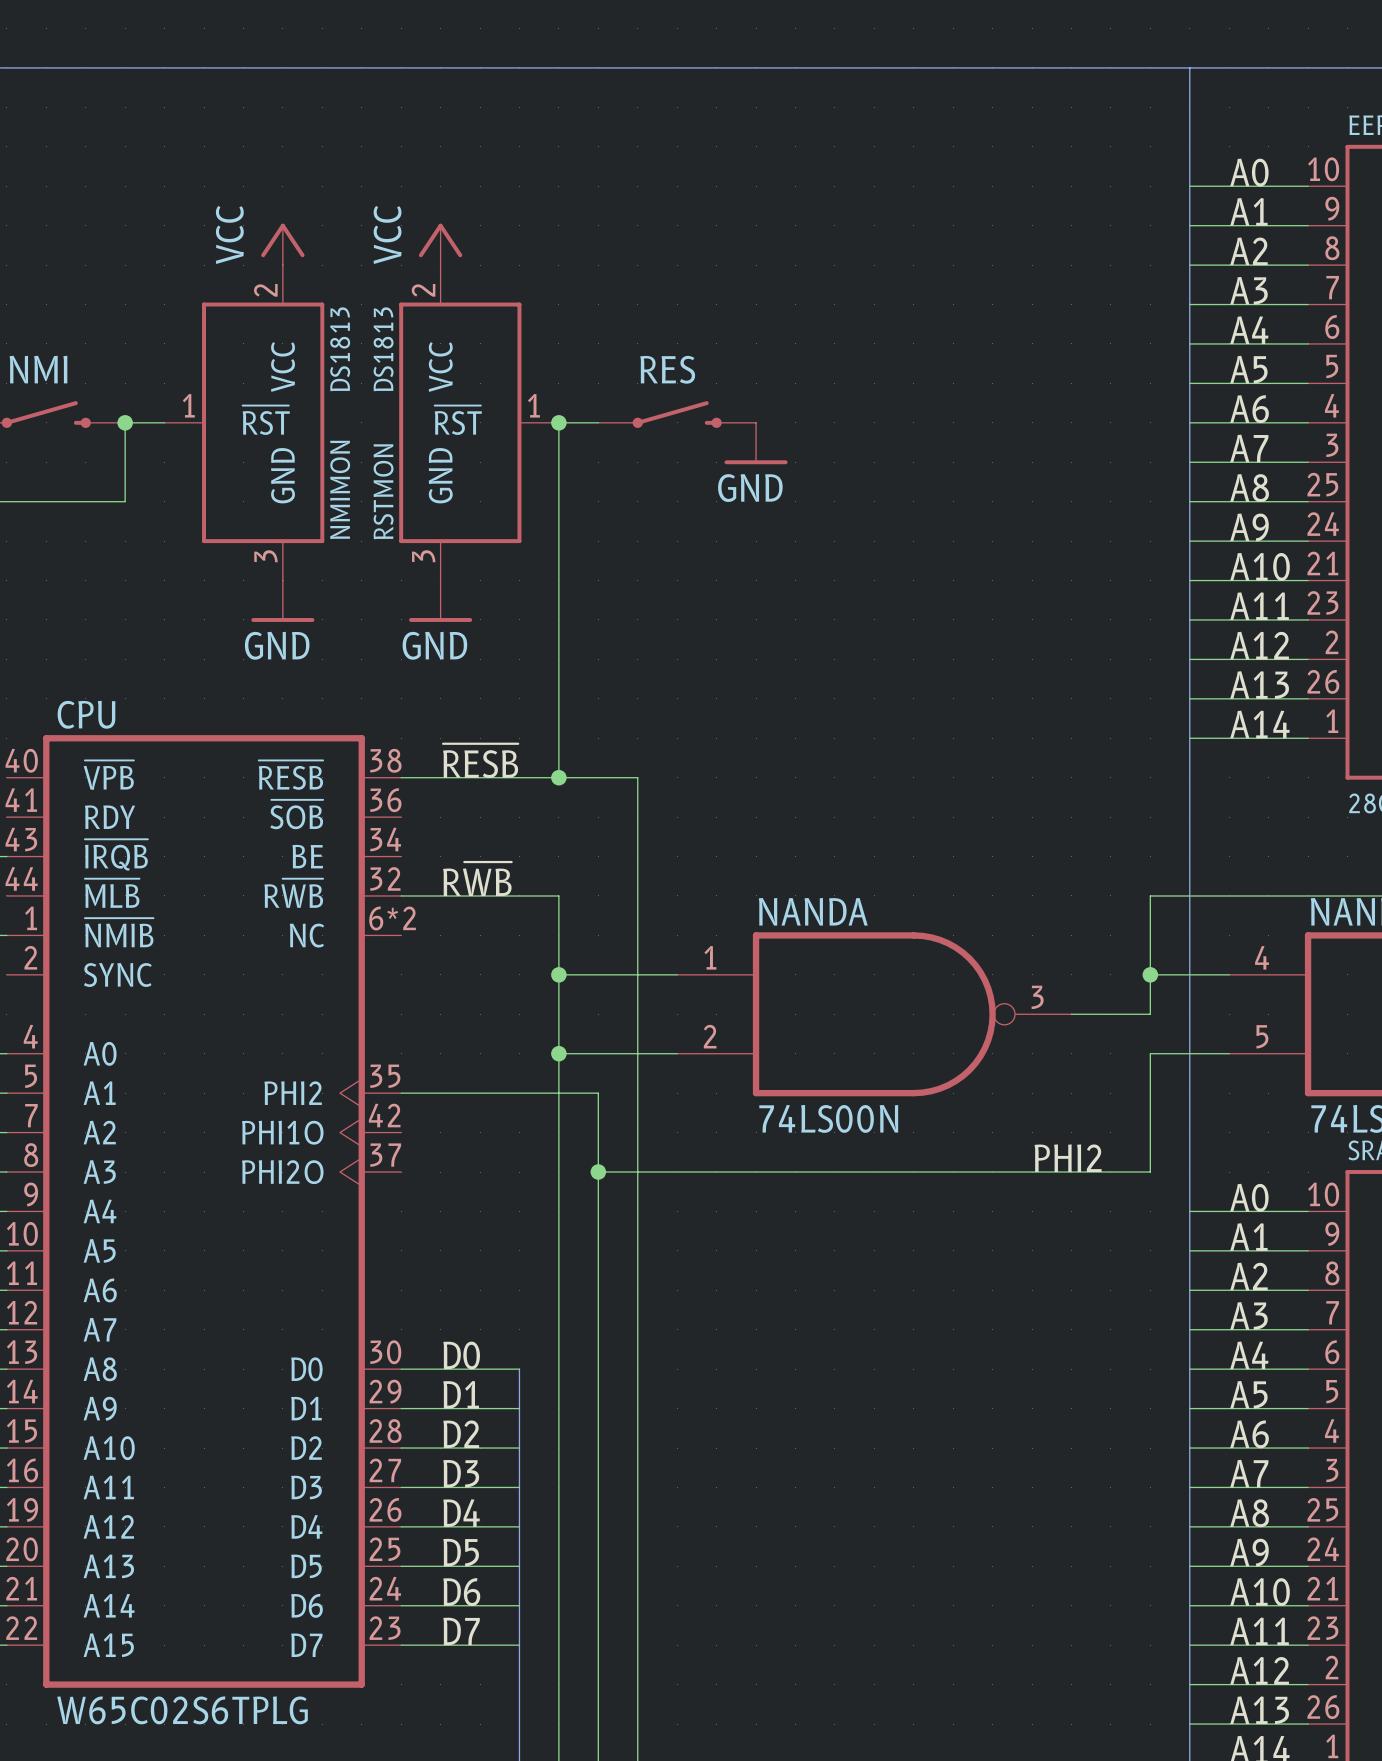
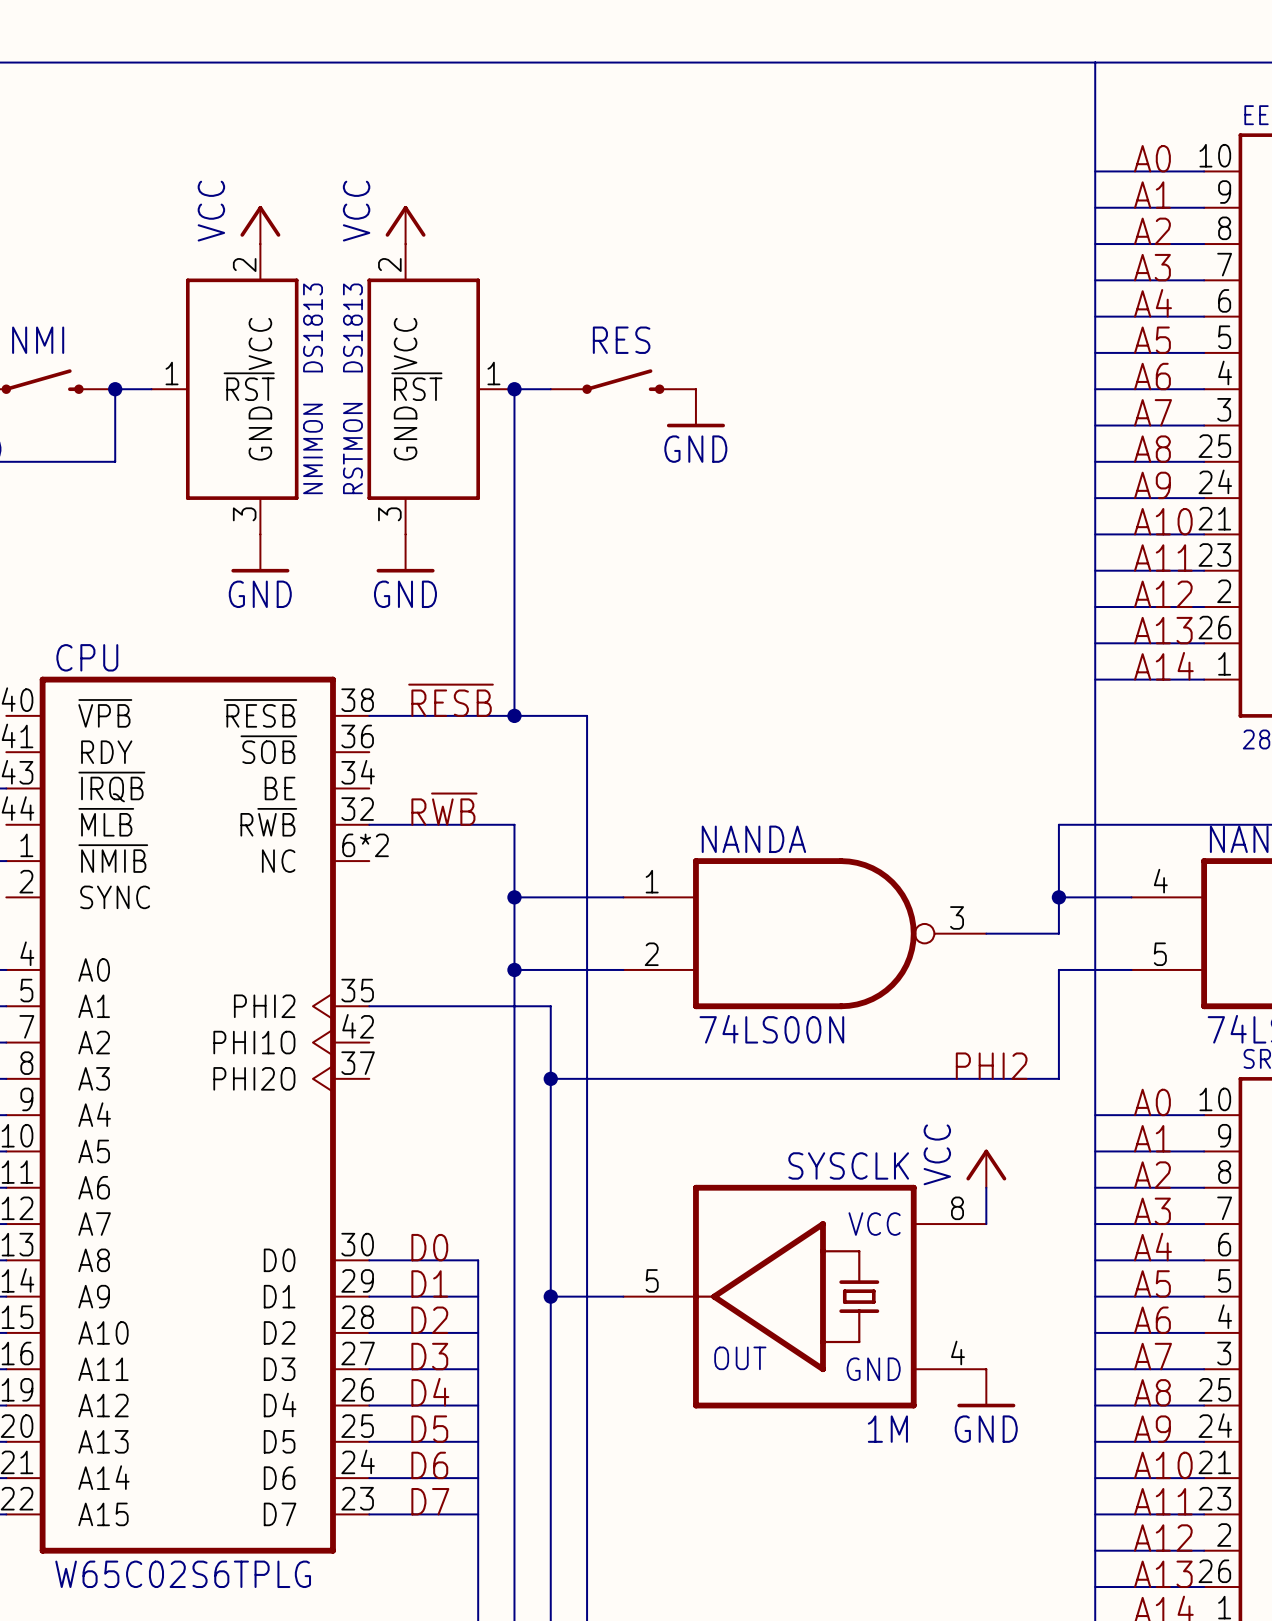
power symbol: none -> VCC (986, 1168)
wire: none -> (986, 1187) (986, 1224)
wire: none -> (550, 1296) (623, 1296)
junction: none -> (550, 1296)
SYSCLK: none -> 1M (804, 1296)
power symbol: none -> GND (986, 1388)

